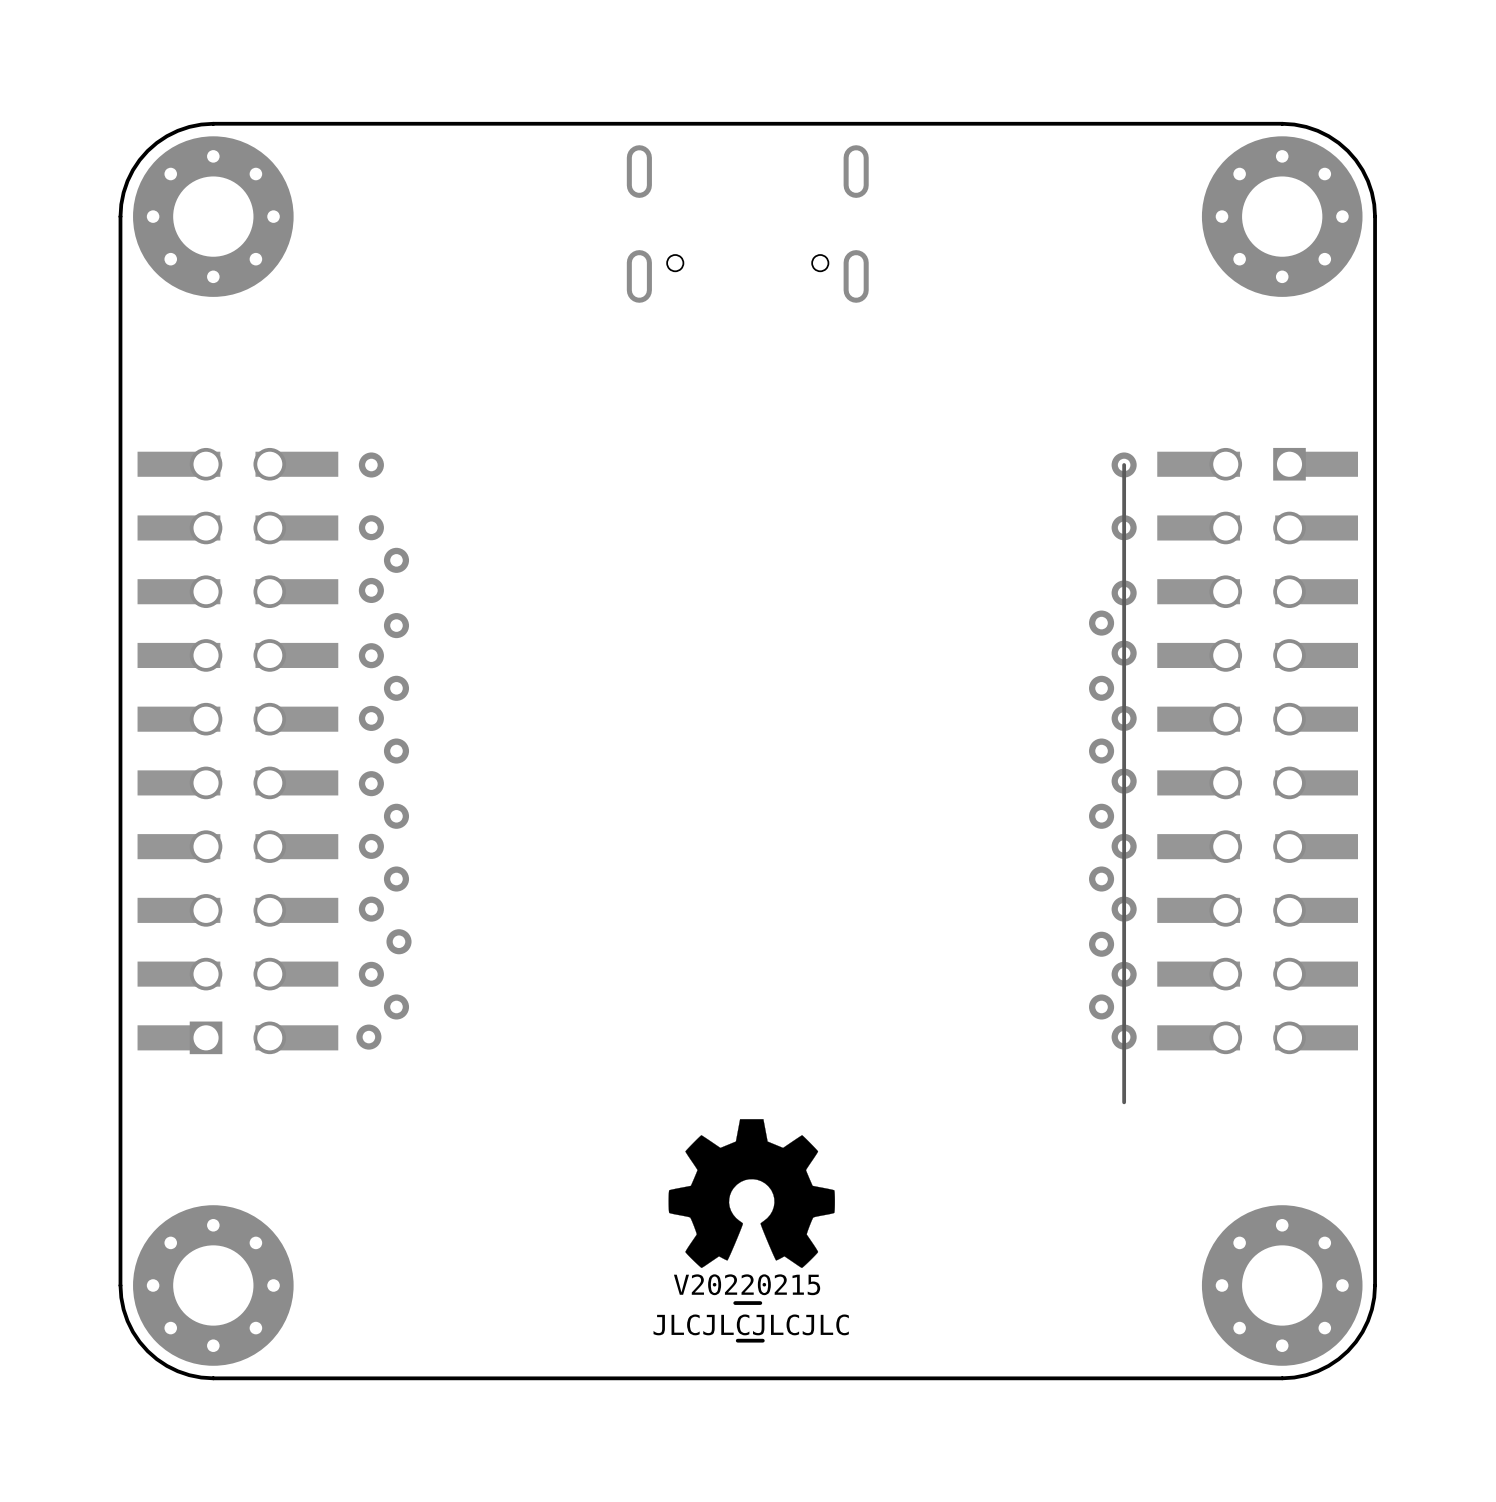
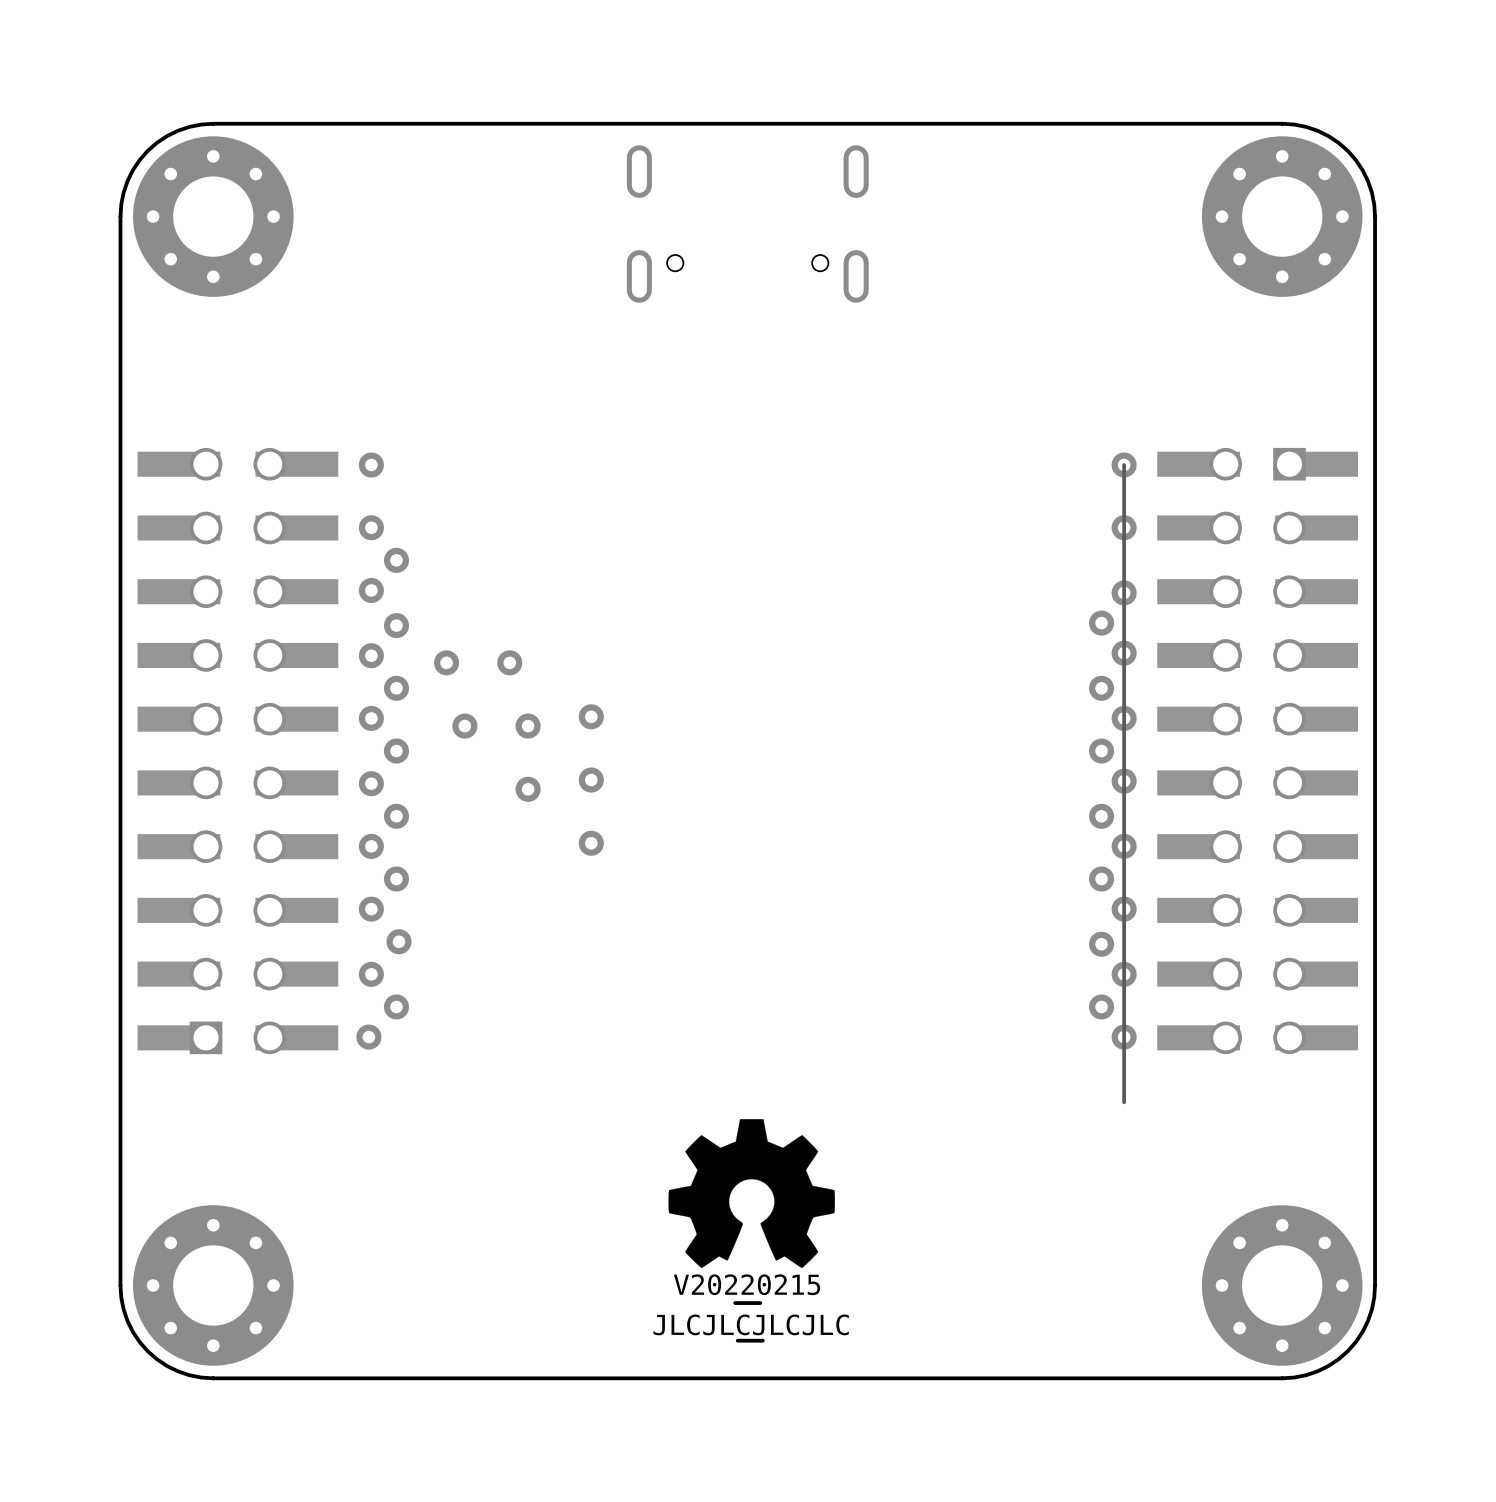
part: none -> (446, 662)
part: none -> (509, 662)
part: none -> (591, 716)
part: none -> (464, 726)
part: none -> (528, 726)
part: none -> (591, 780)
part: none -> (528, 789)
part: none -> (591, 843)

